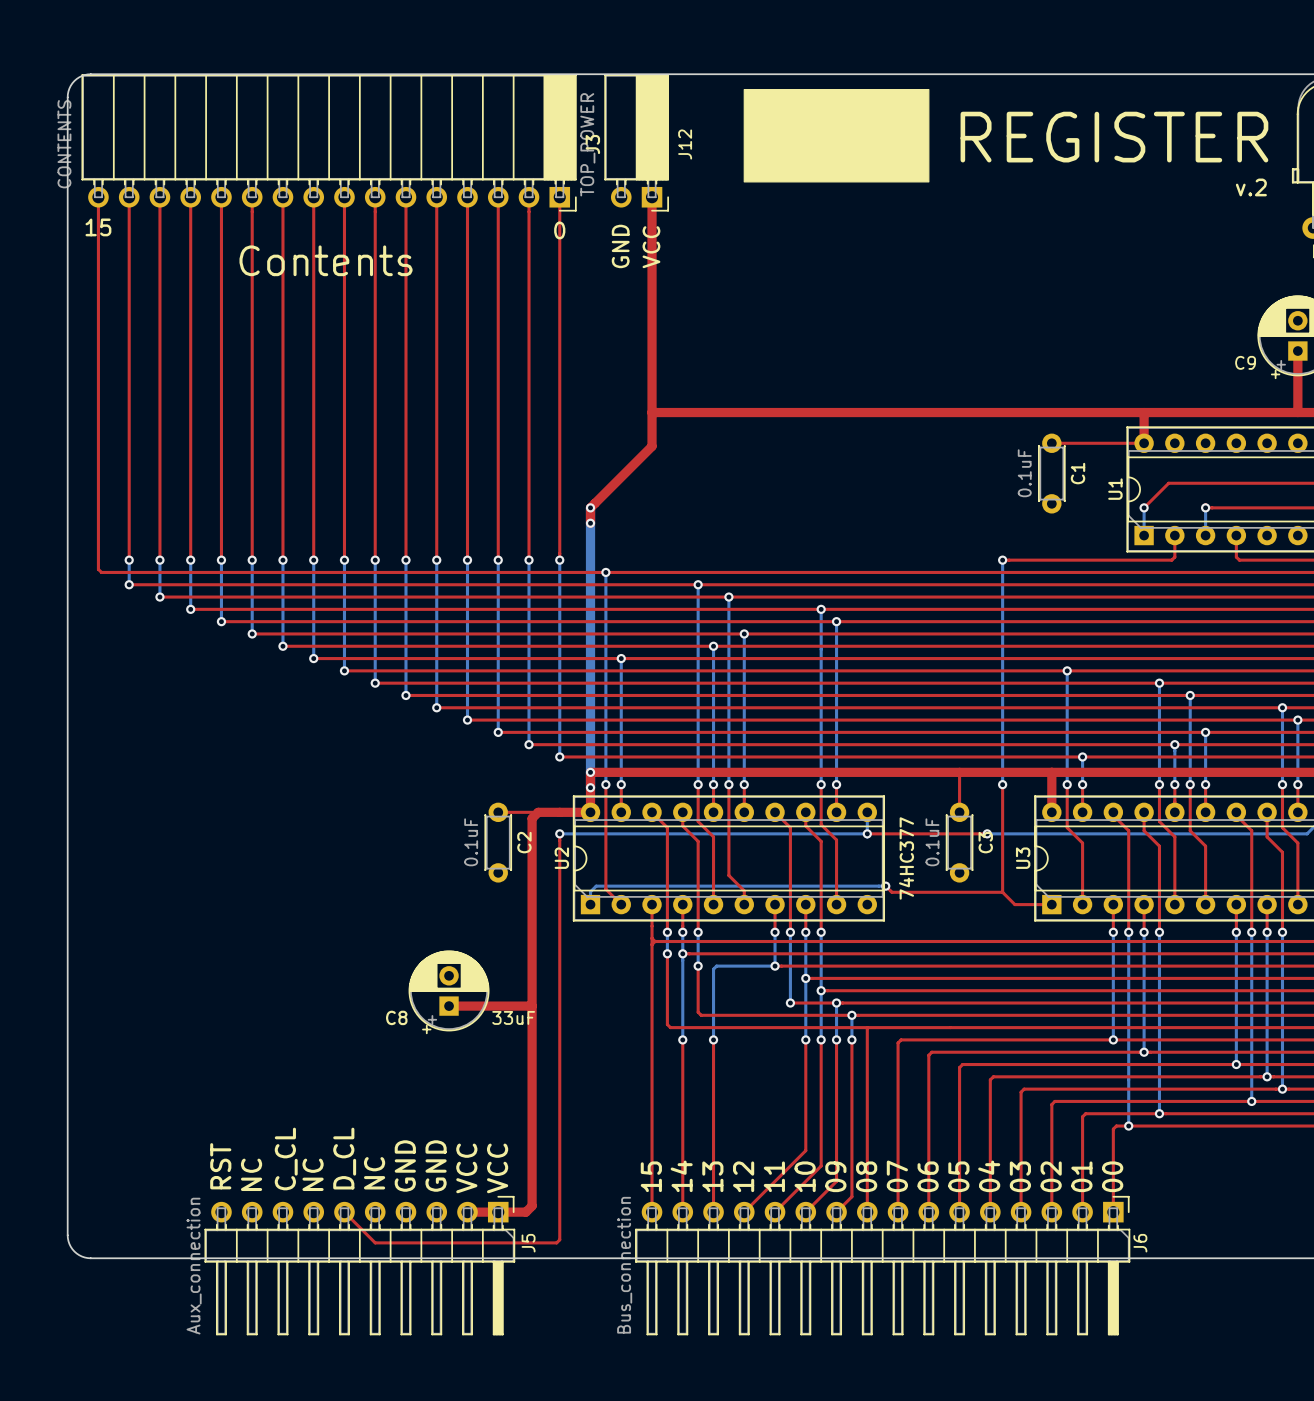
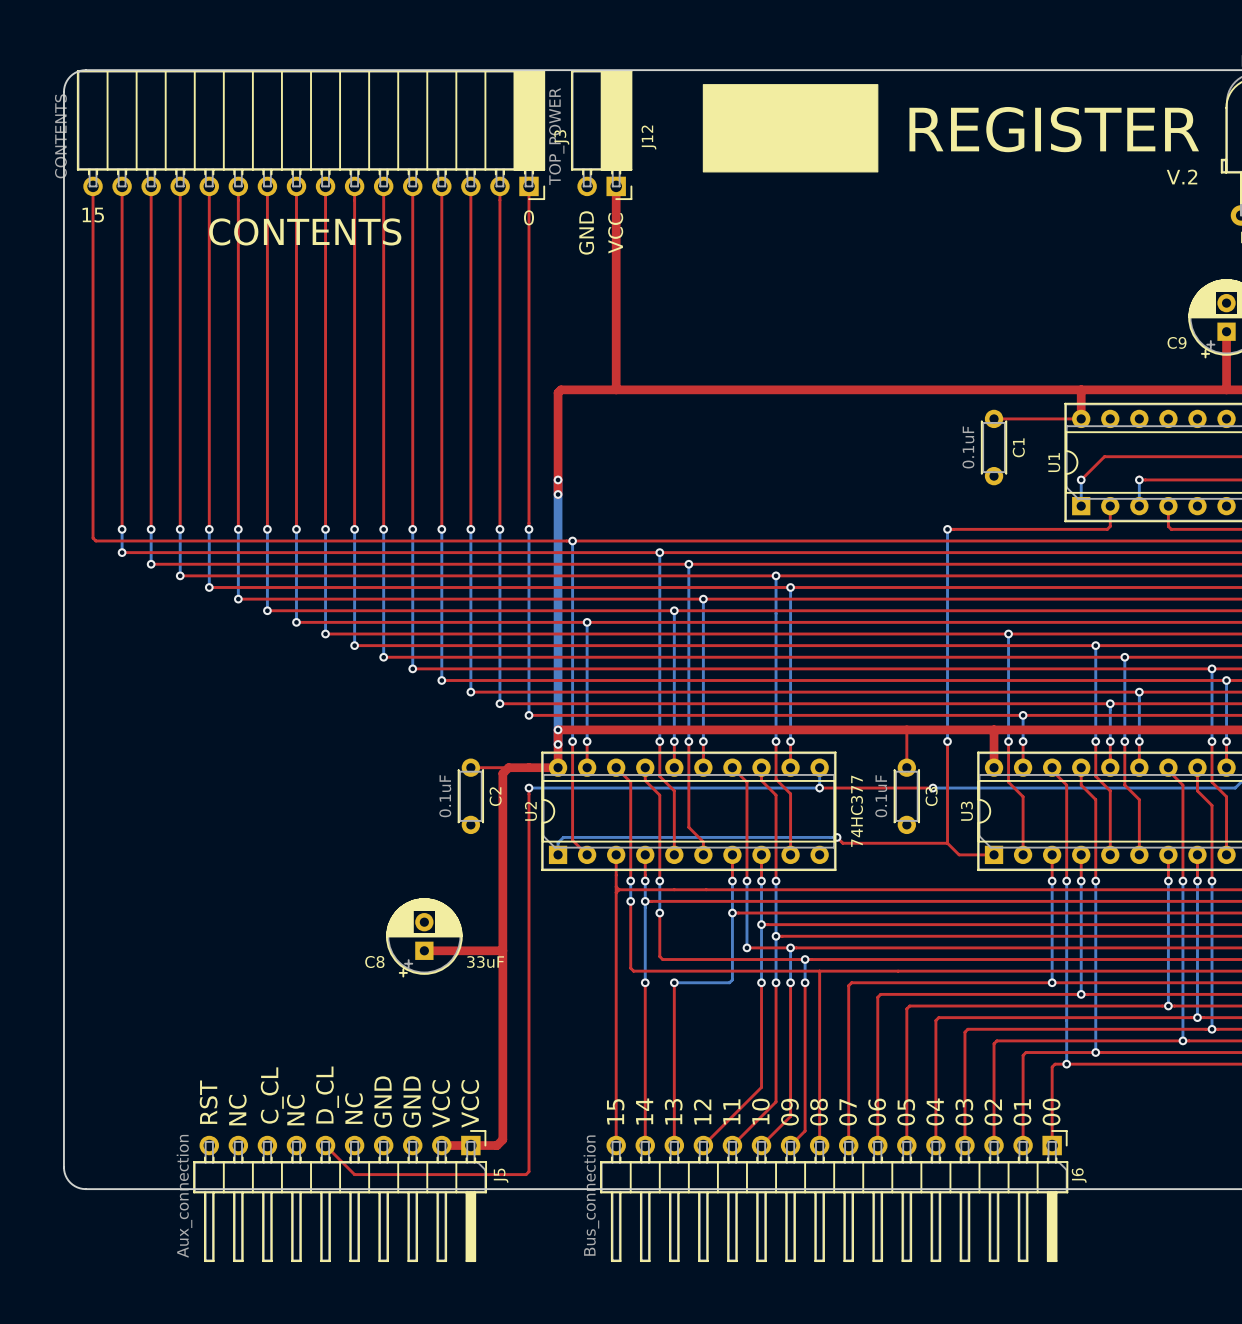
text: v.2 (1251, 187) -> V.2 (1182, 177)
text: none -> CONTENTS (305, 231)
text: Contents (326, 260) -> none
top track: (652, 412) (652, 446) (590, 507) -> (616, 389) (560, 389) (558, 392) (558, 479)
bottom track: (775, 966) (716, 966) (713, 969) (713, 1039) -> (732, 913) (732, 979) (729, 982) (674, 982)

